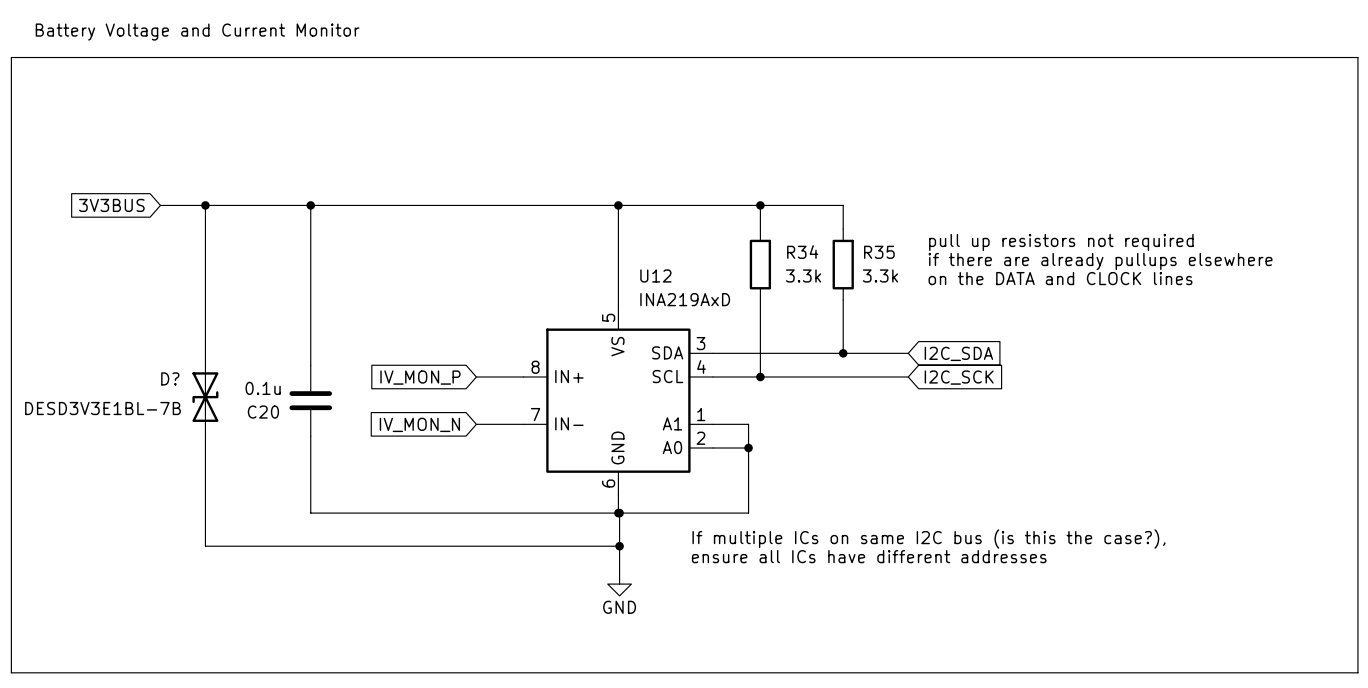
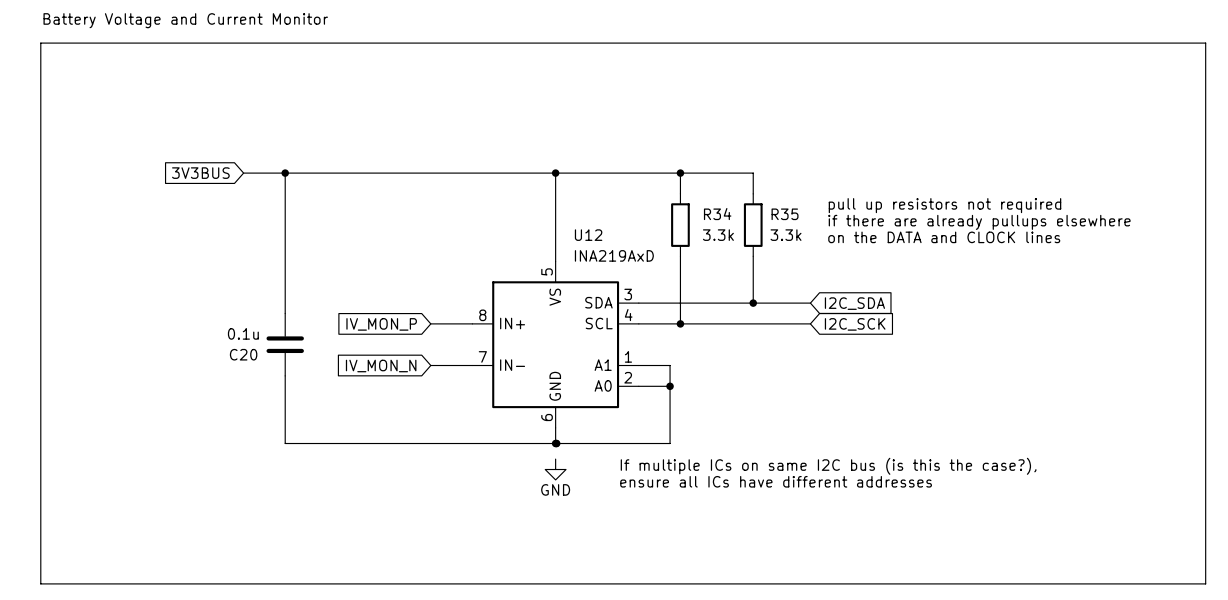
line: (32, 57) (11, 57) (11, 672) (32, 672) -> (40, 43) (40, 583)
global label position: 3V3BUS (111, 205) -> 3V3BUS (200, 173)
wire: (160, 205) (263, 205) -> none
wire: (205, 205) (205, 361) -> none
junction: (205, 205) -> none
D?: DESD3V3E1BL-7B (205, 397) -> none
wire: (205, 432) (205, 546) (619, 546) -> none
wire: (619, 513) (619, 572) -> none
junction: (619, 546) -> none
power symbol position: GND (619, 584) -> GND (555, 469)

